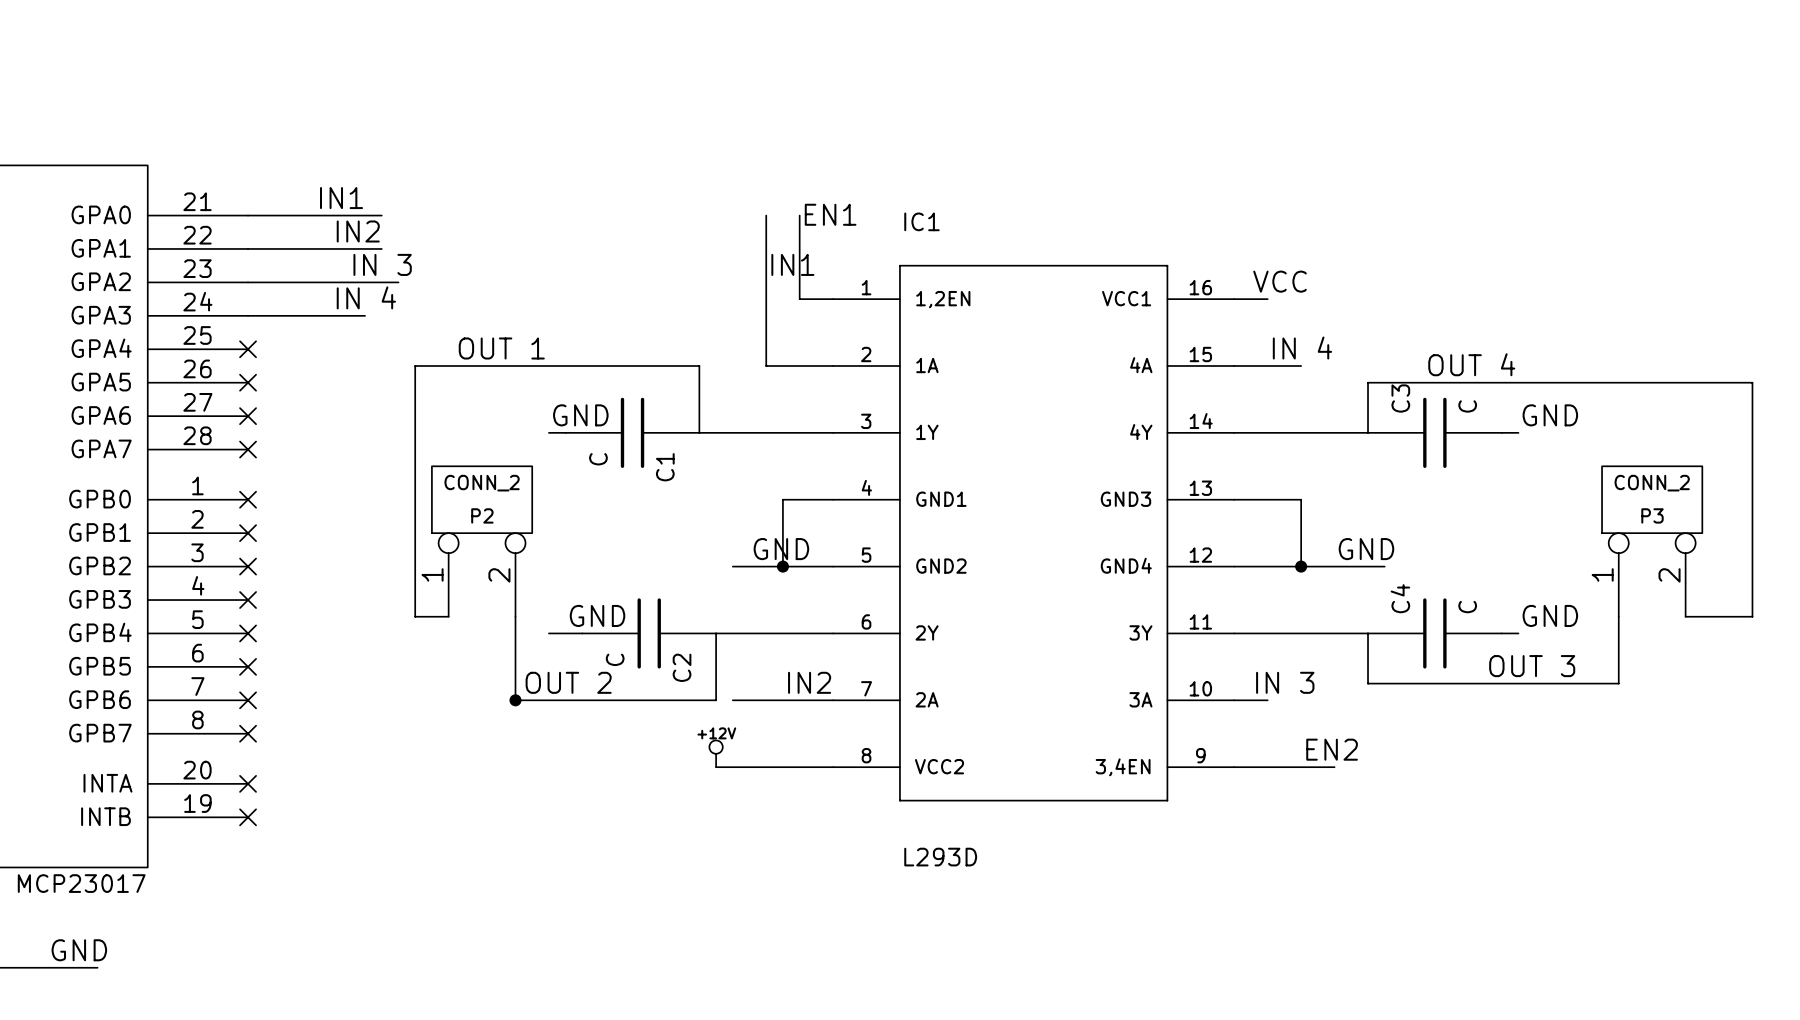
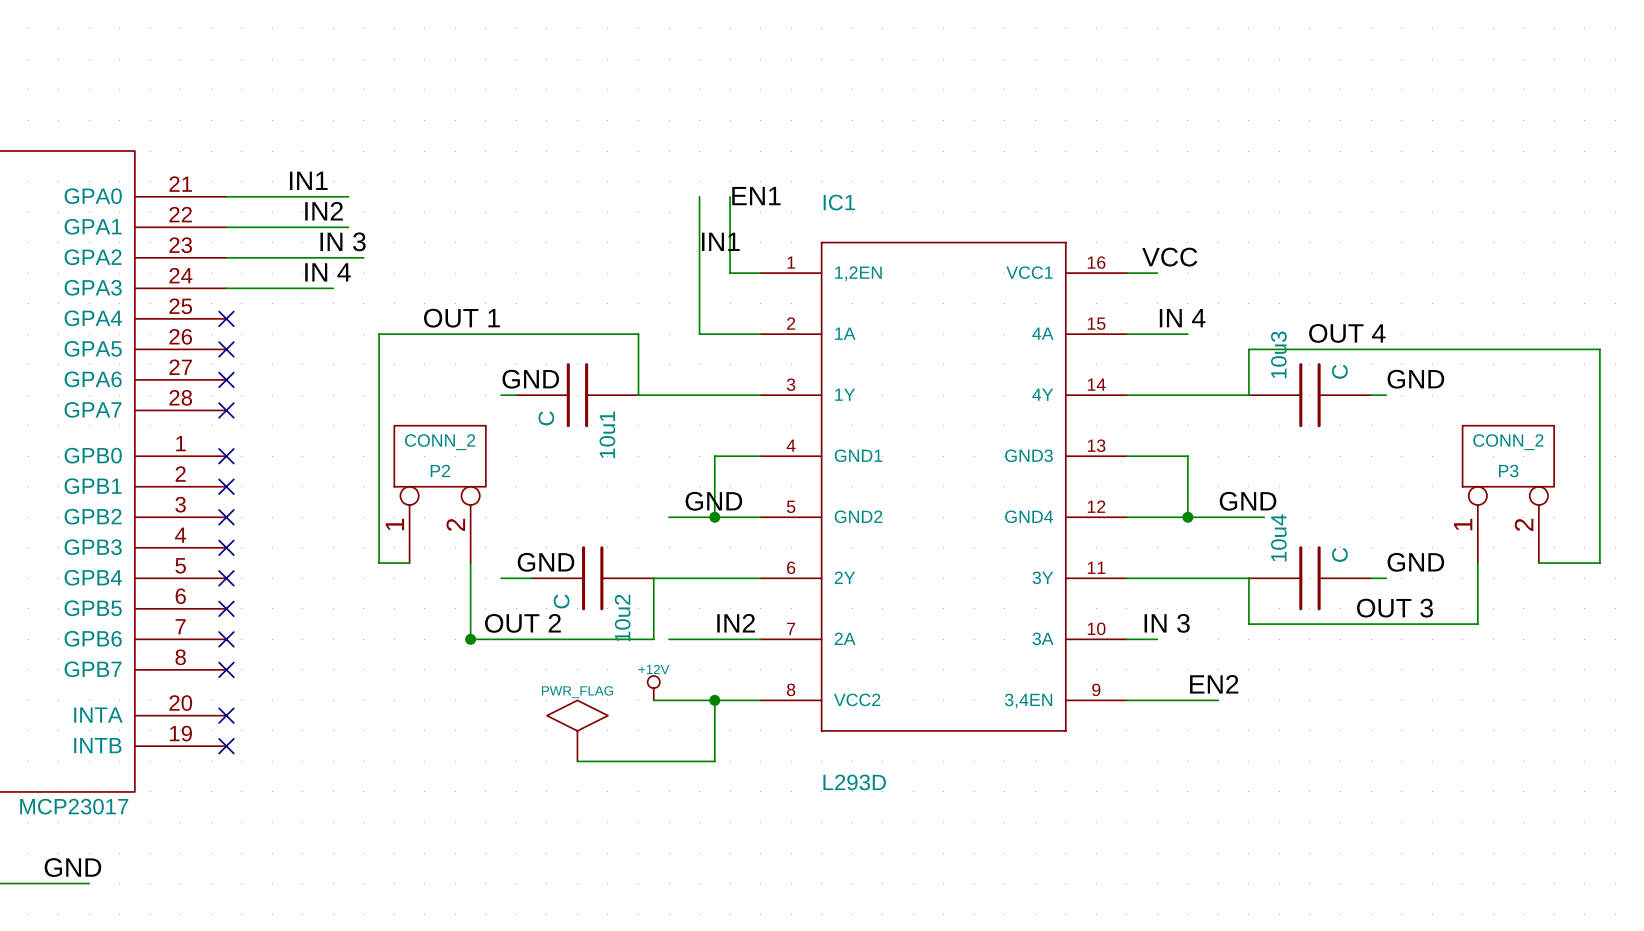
C3 name: C3 (1400, 398) -> 10u3 (1278, 354)
C1 name: C1 (665, 467) -> 10u1 (607, 434)
C4 name: C4 (1400, 598) -> 10u4 (1278, 537)
C2 name: C2 (682, 667) -> 10u2 (622, 617)
wire: none -> (714, 700) (714, 761) (577, 761)
junction: none -> (714, 700)
power symbol: none -> PWR_FLAG (577, 730)

